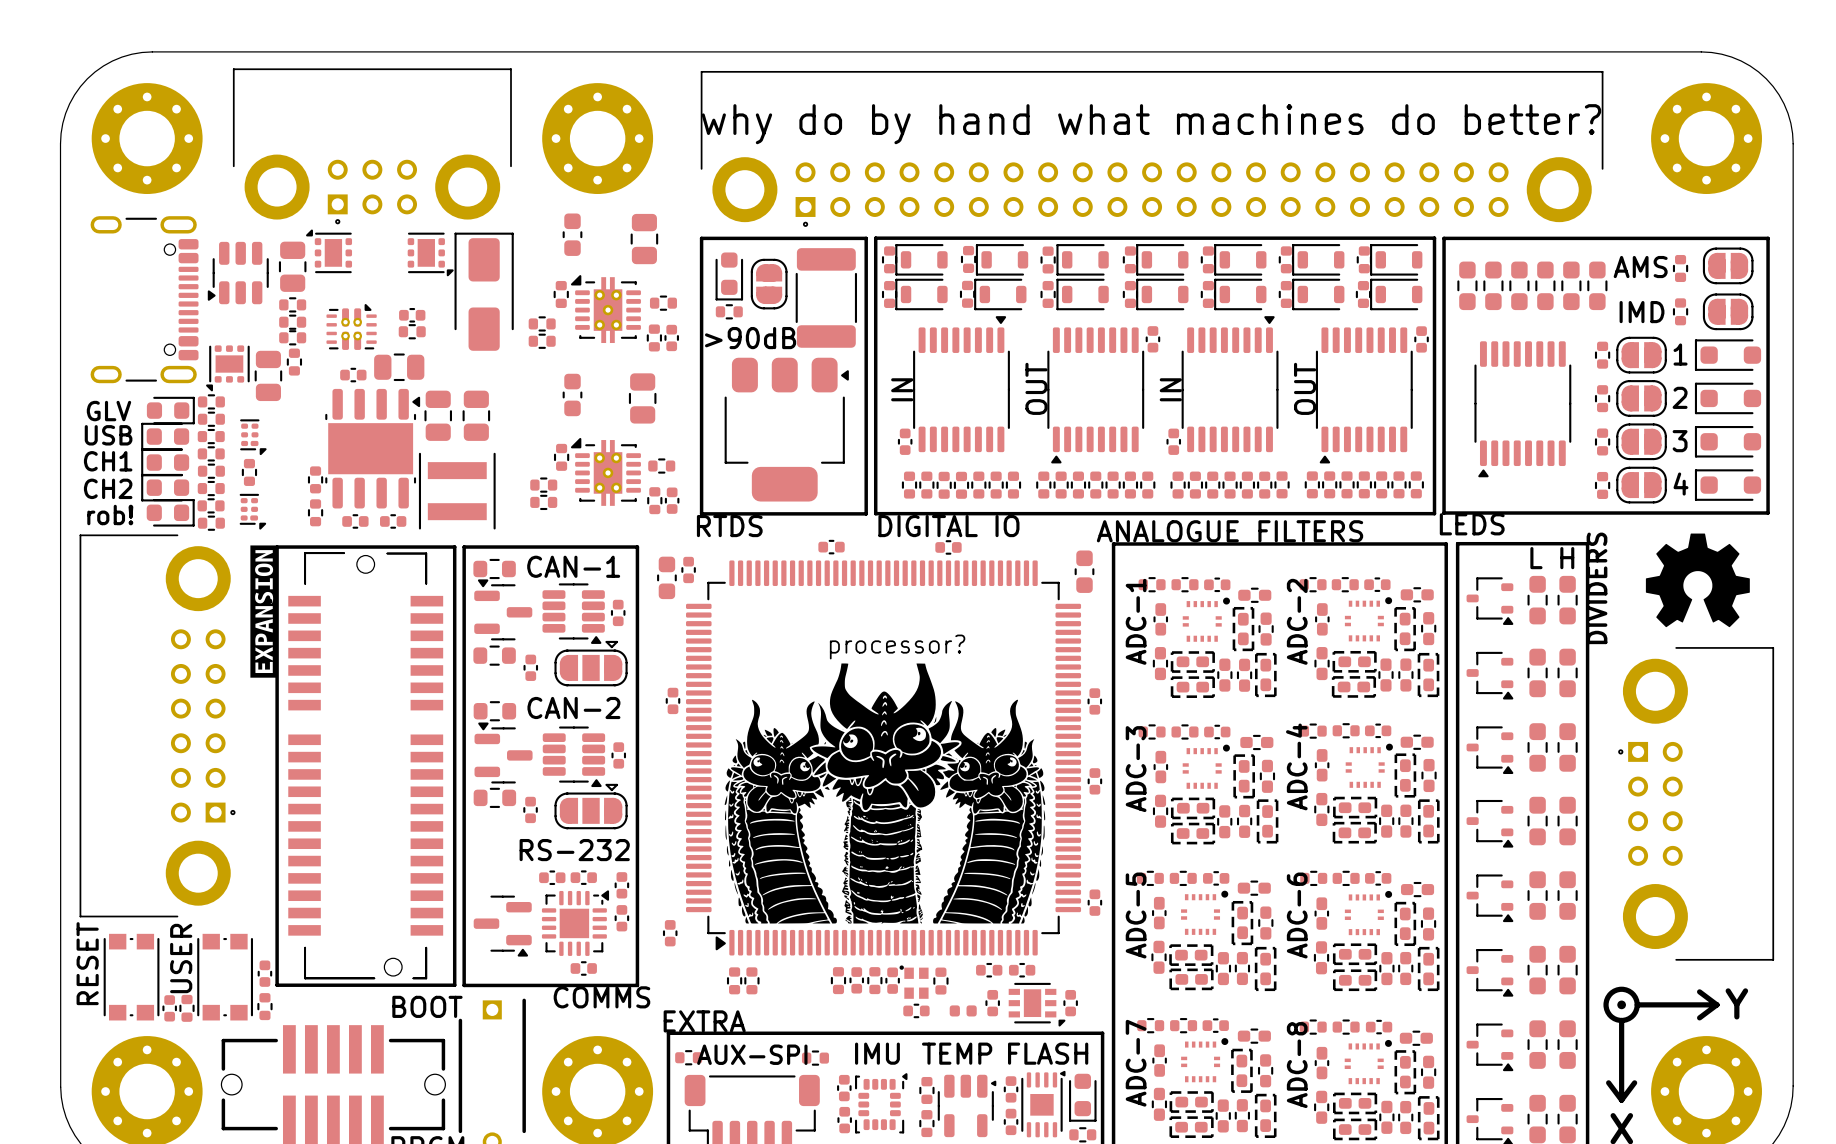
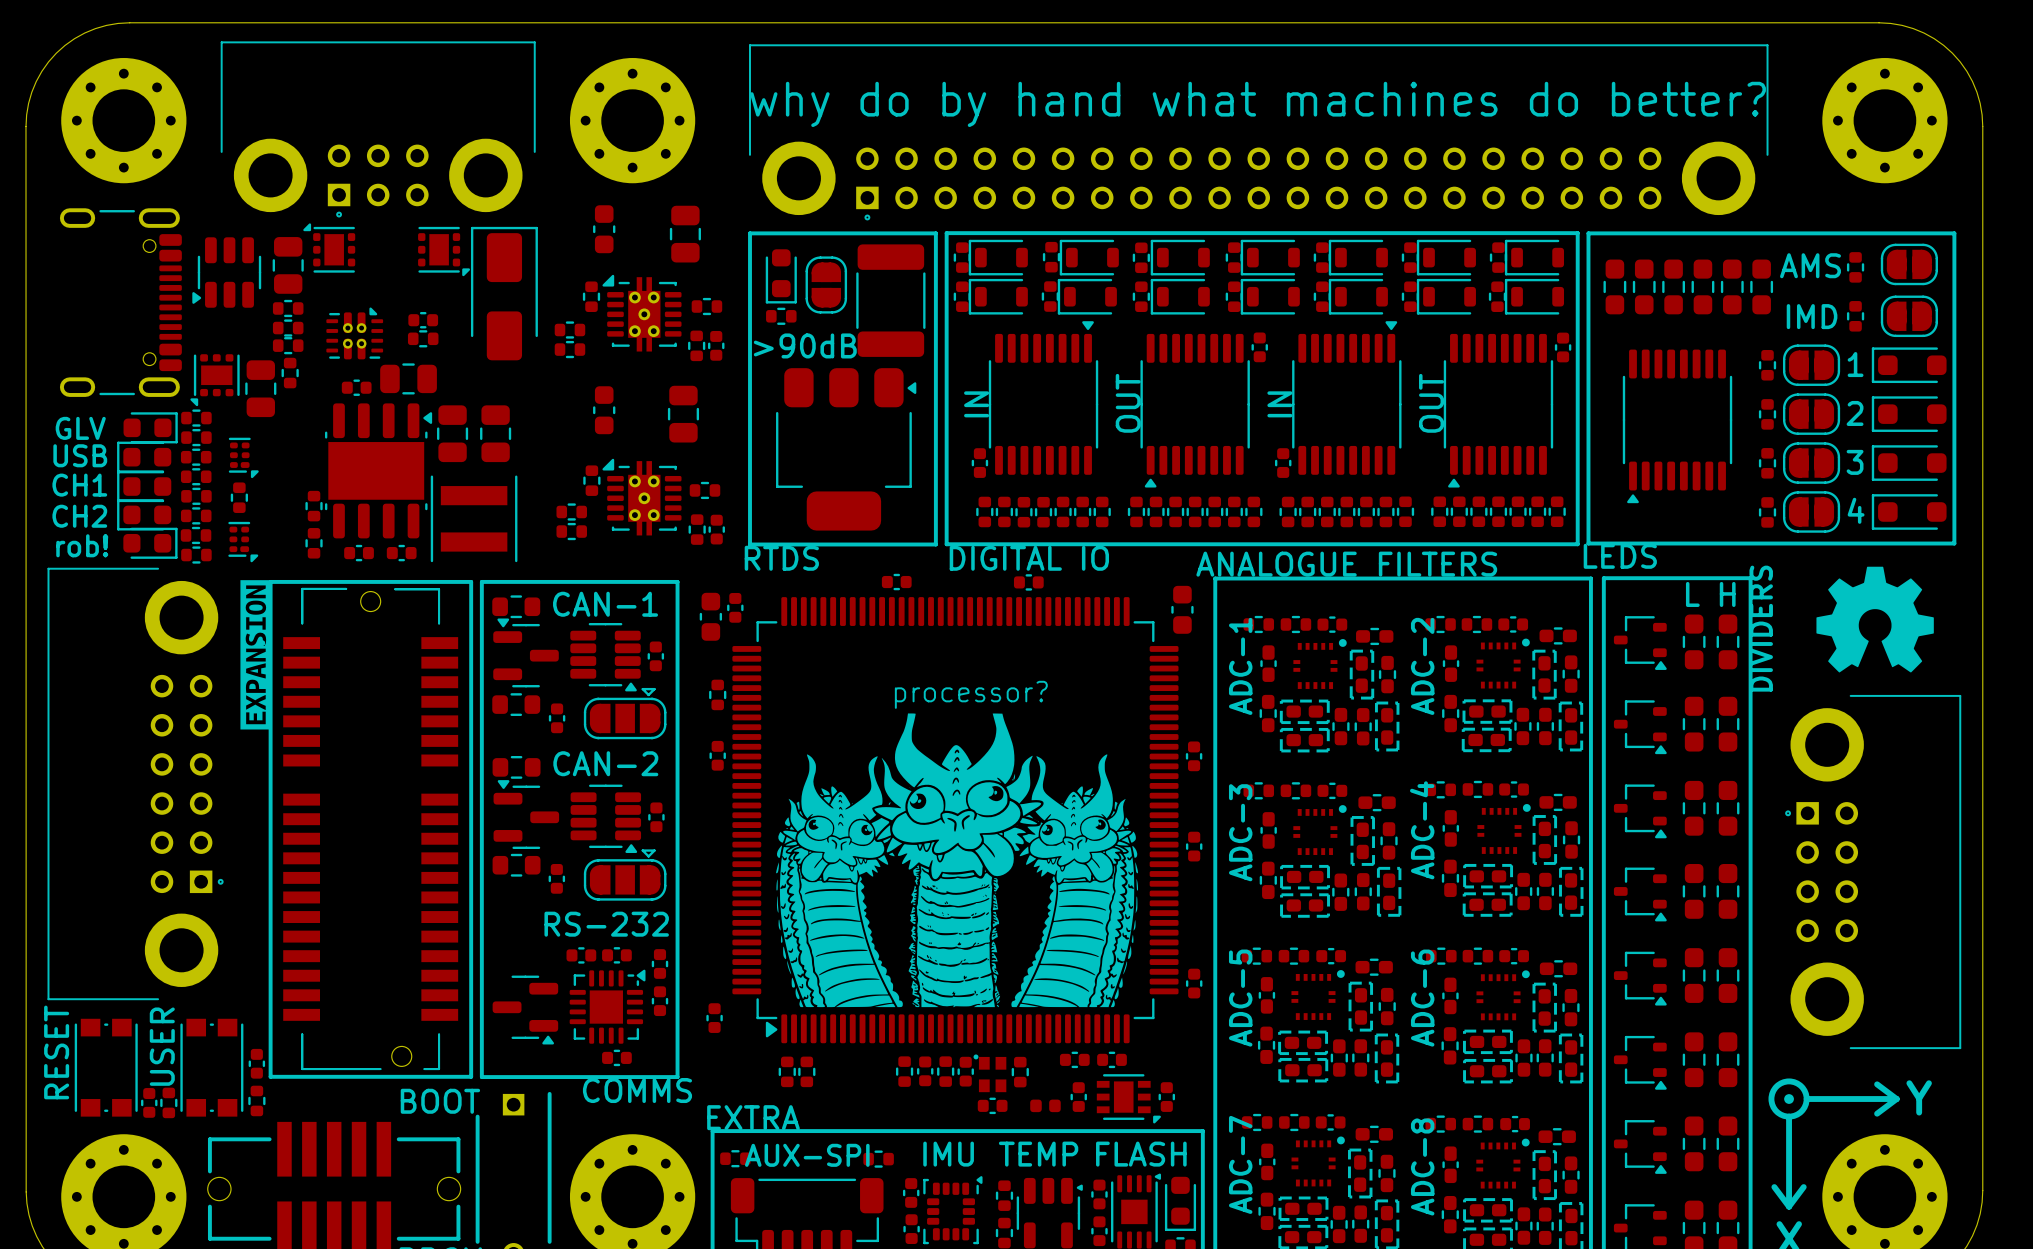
part: none -> (717, 694)

